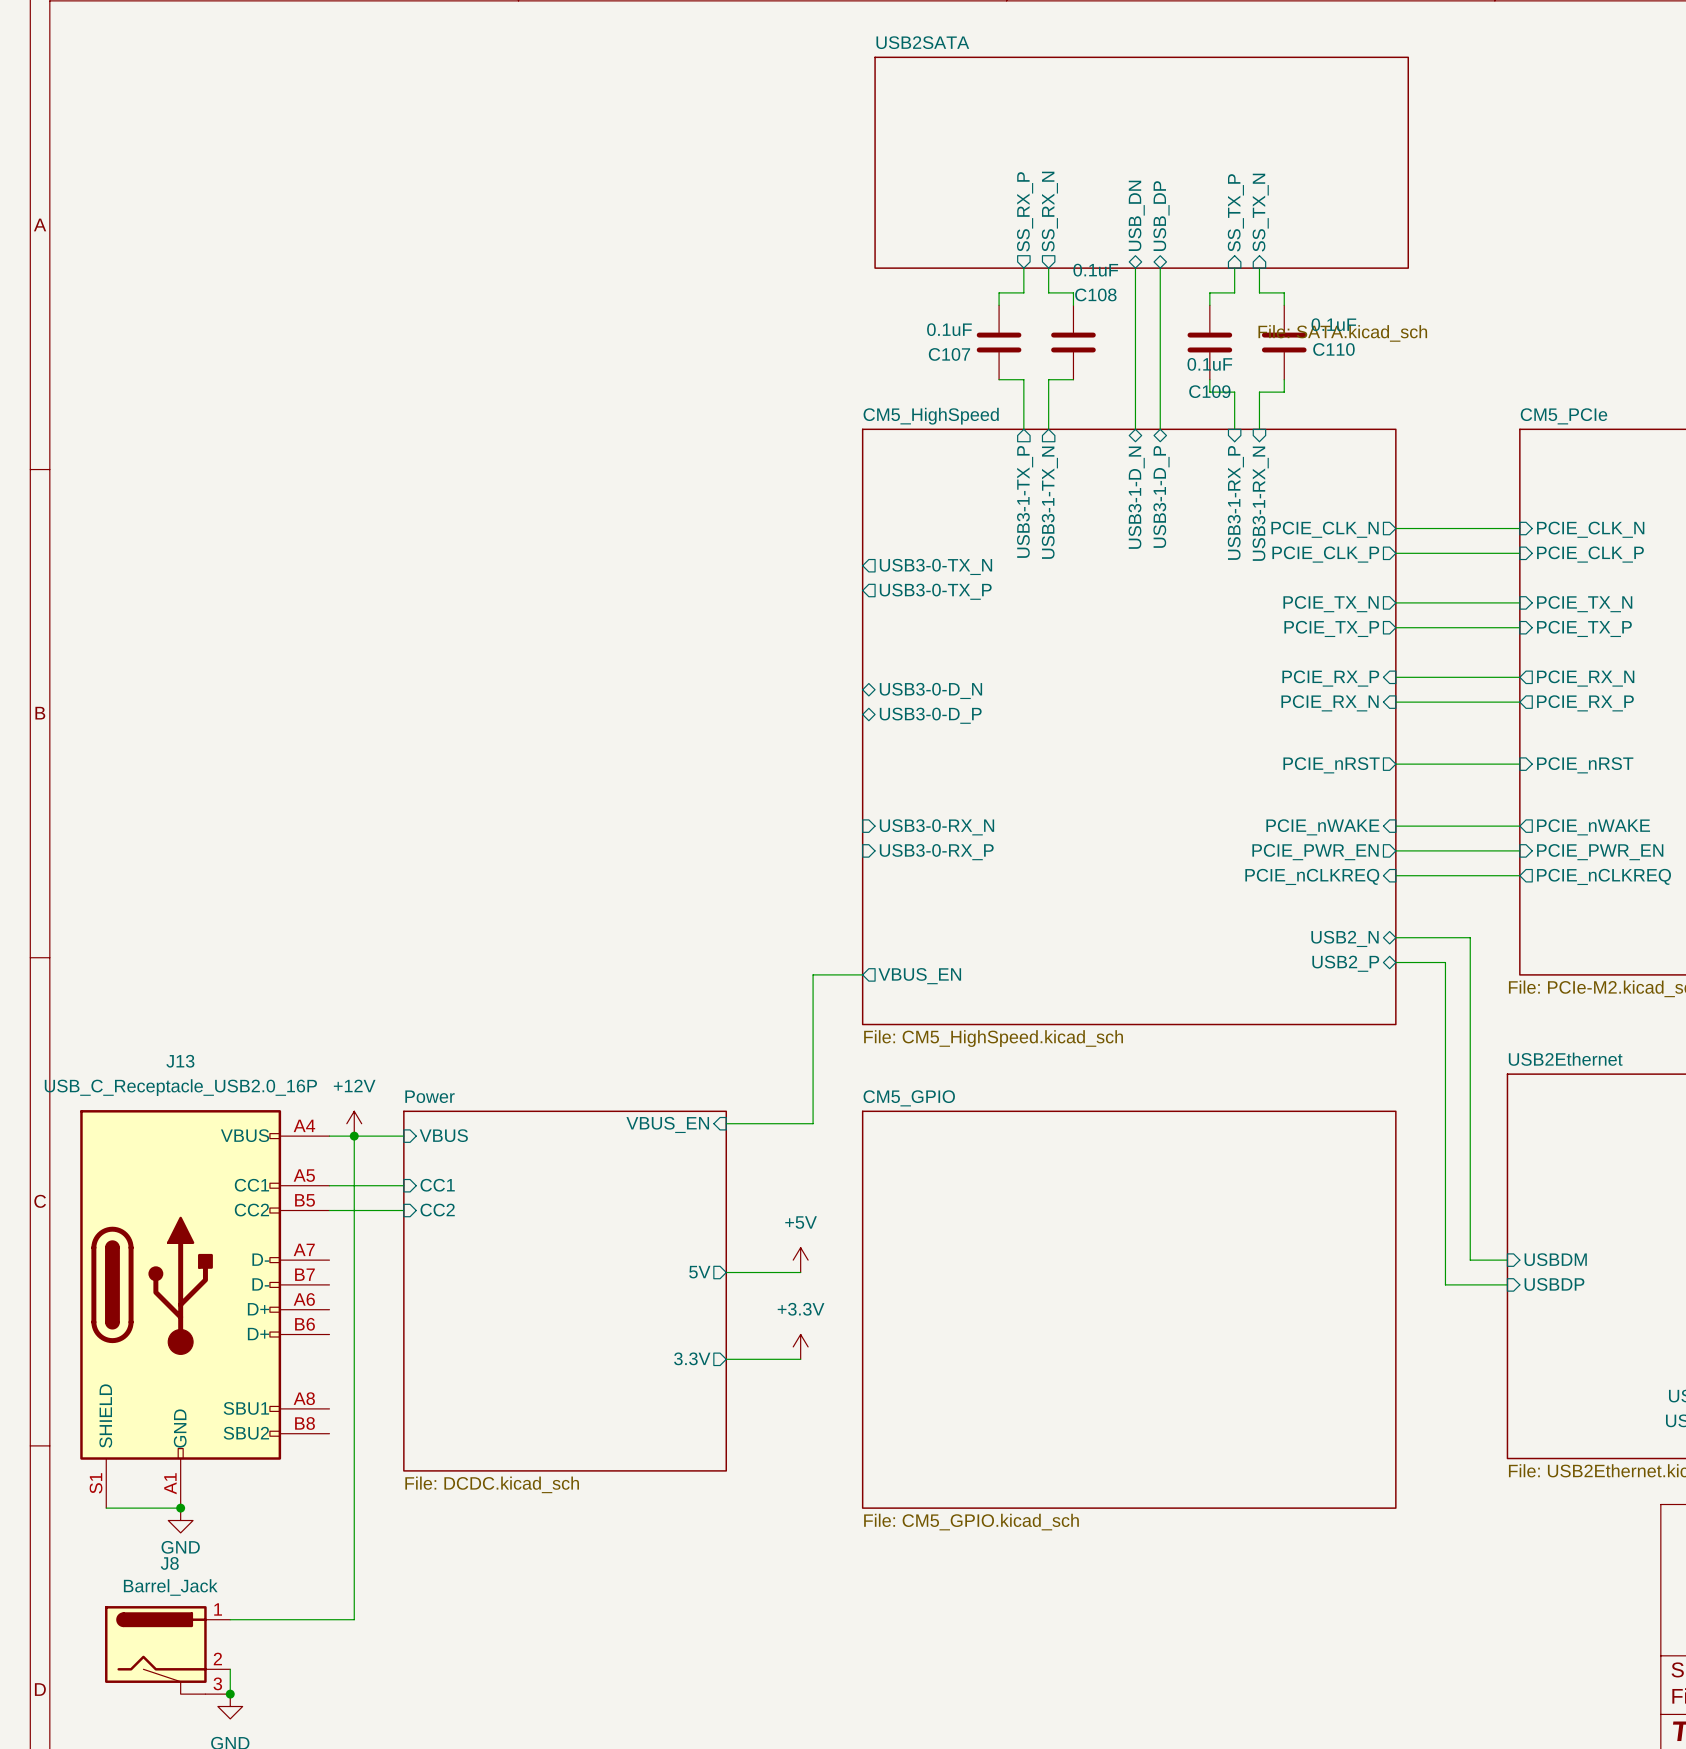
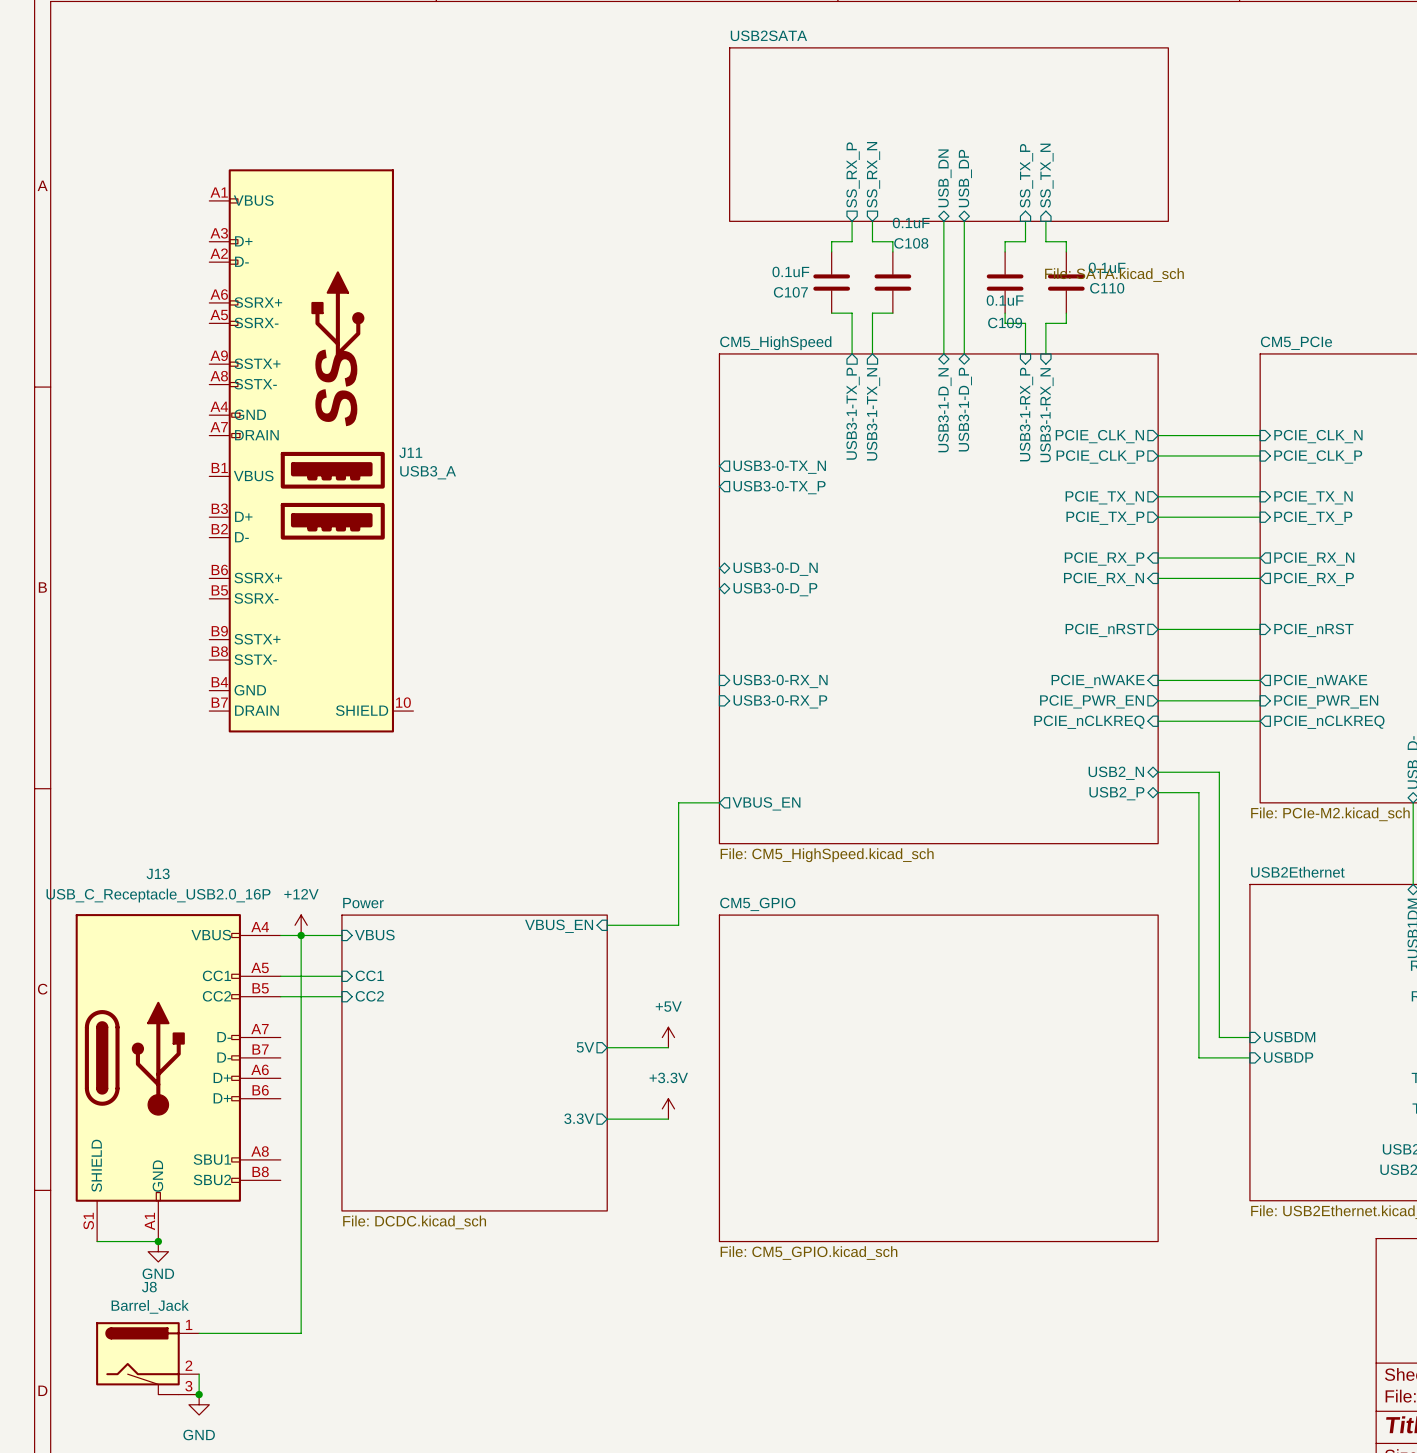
J11: none -> USB3_A (311, 450)

